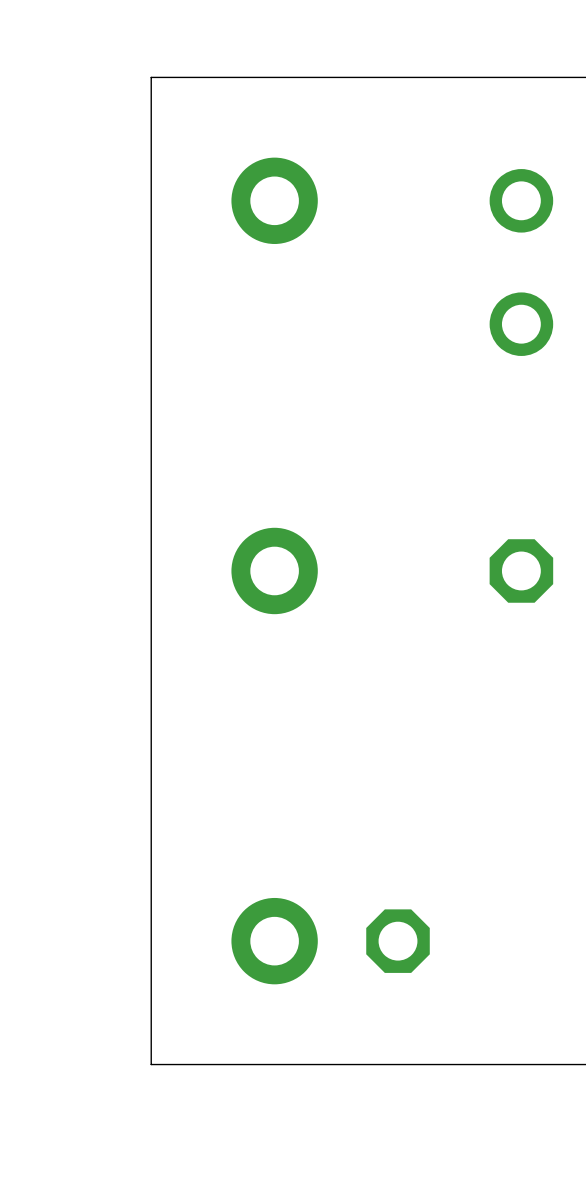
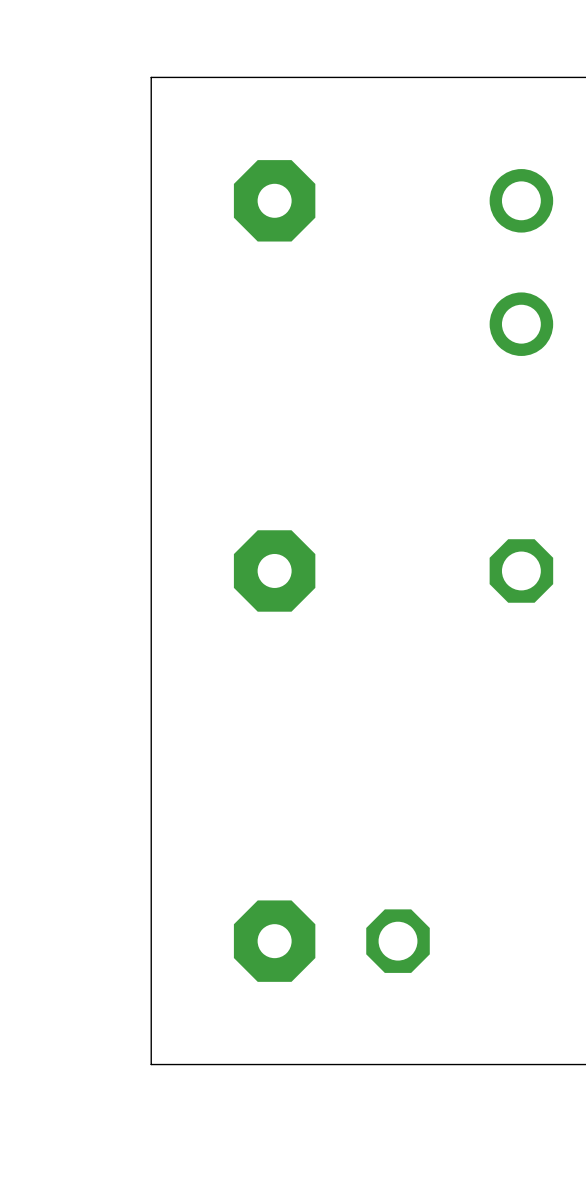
part footprint: [231, 157, 318, 244] -> [233, 160, 316, 242]
part footprint: [231, 527, 318, 615] -> [233, 530, 316, 612]
part footprint: [231, 897, 318, 985] -> [233, 900, 316, 982]

